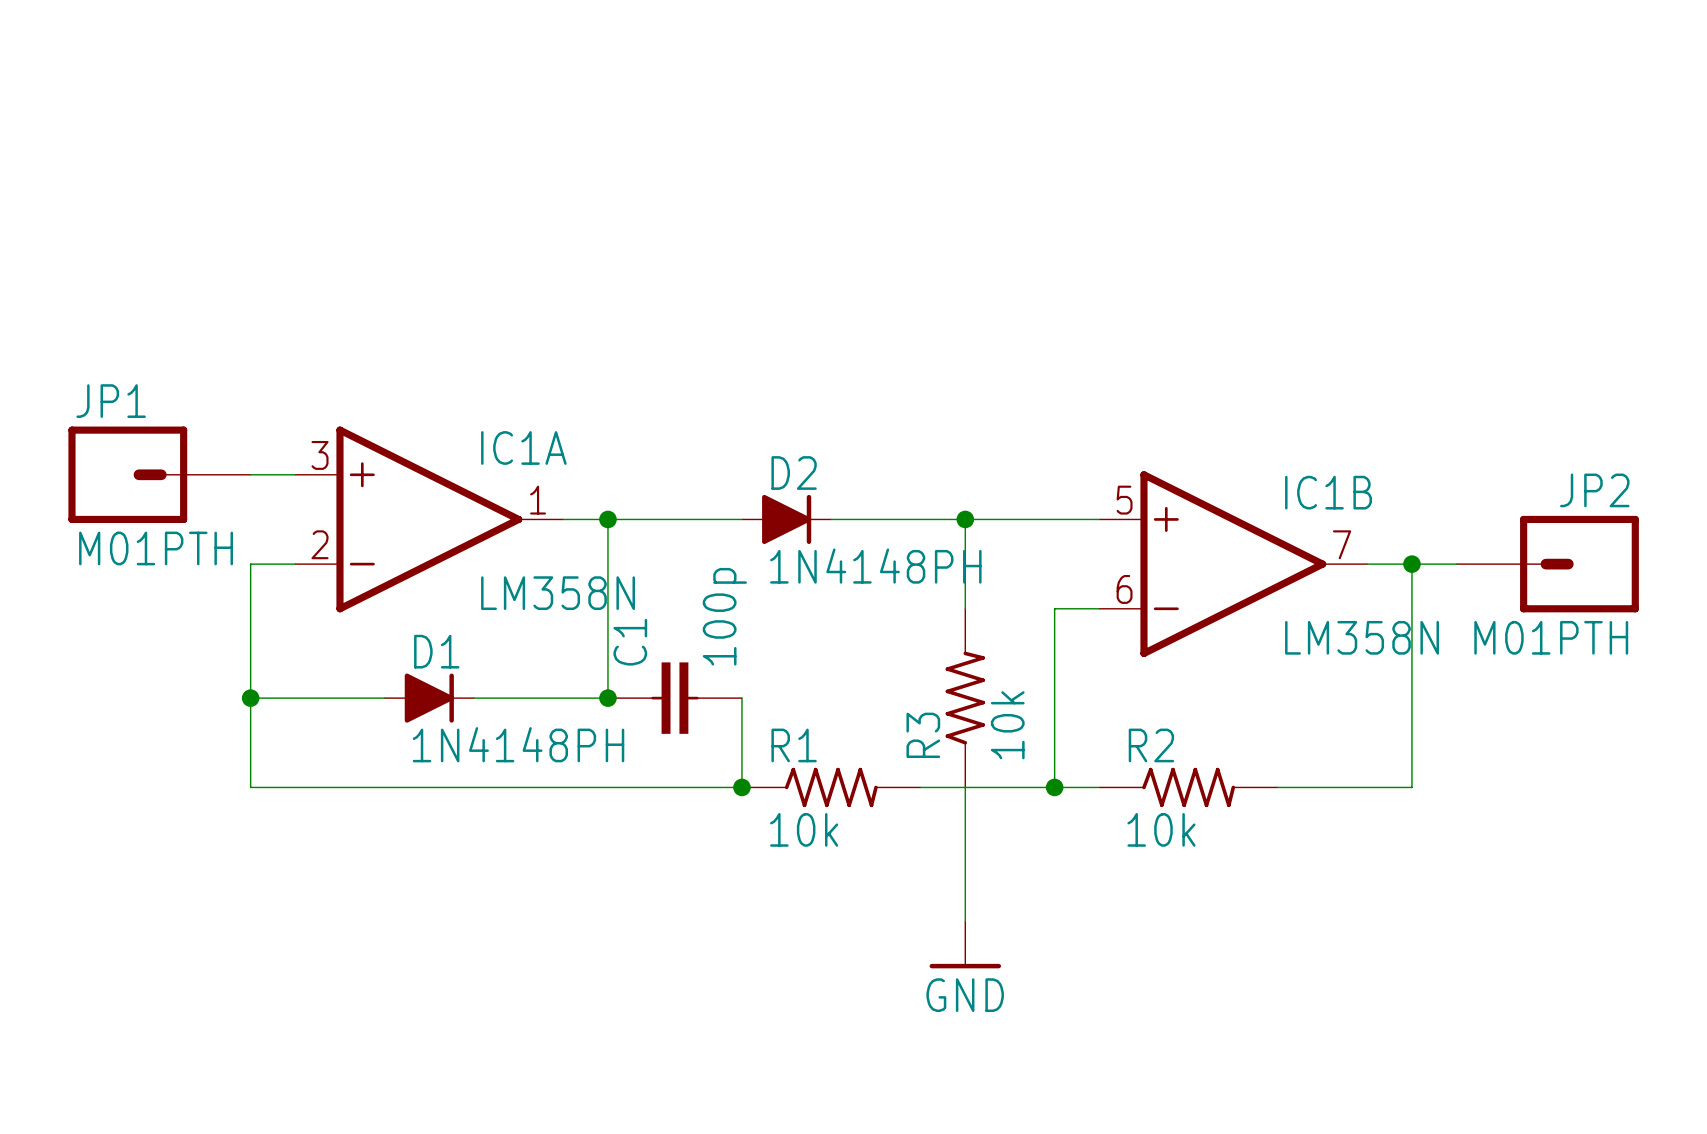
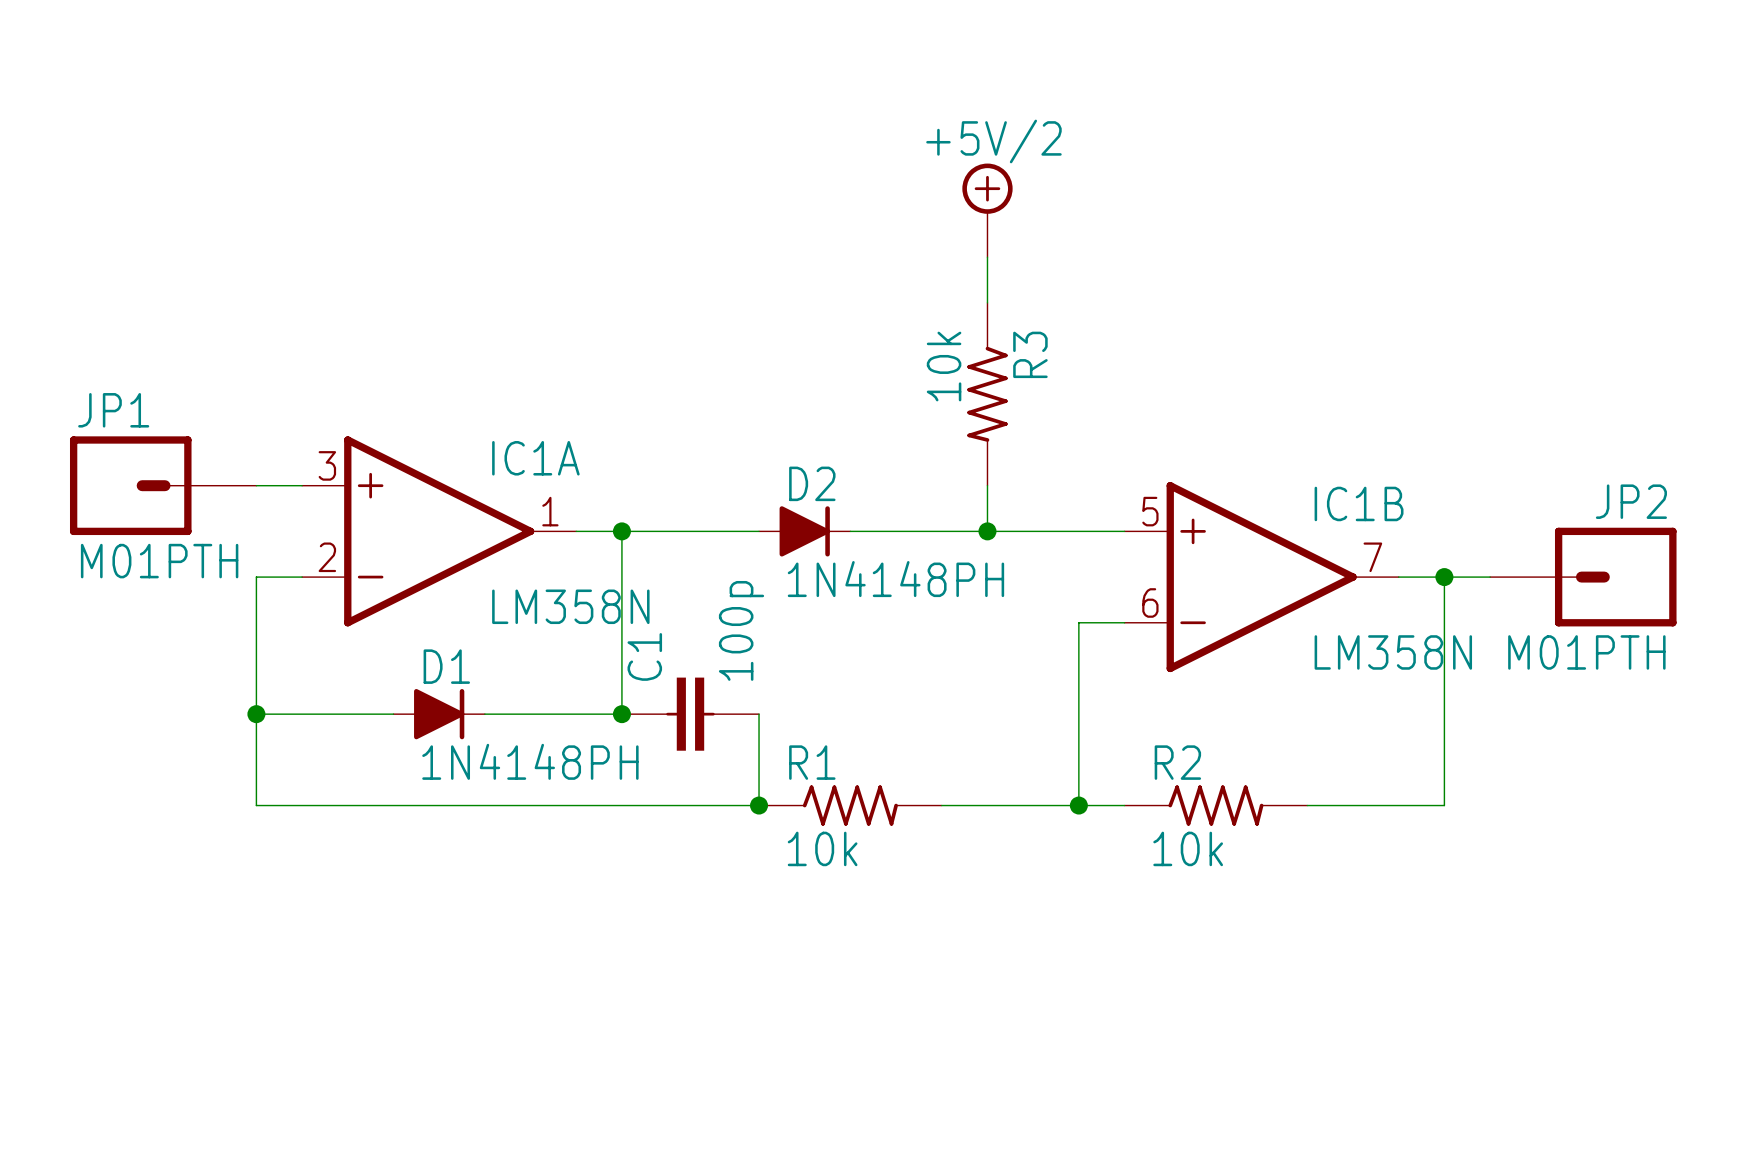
power symbol: none -> +5V/2 (987, 210)
wire: none -> (987, 257) (987, 302)
wire: (965, 519) (965, 608) -> (987, 531) (987, 485)
R3 rotation: 0° (965, 698) -> 180° (987, 394)
R3 position: (965, 698) -> (987, 394)
wire: (965, 787) (965, 921) -> none
power symbol: GND (965, 944) -> none

